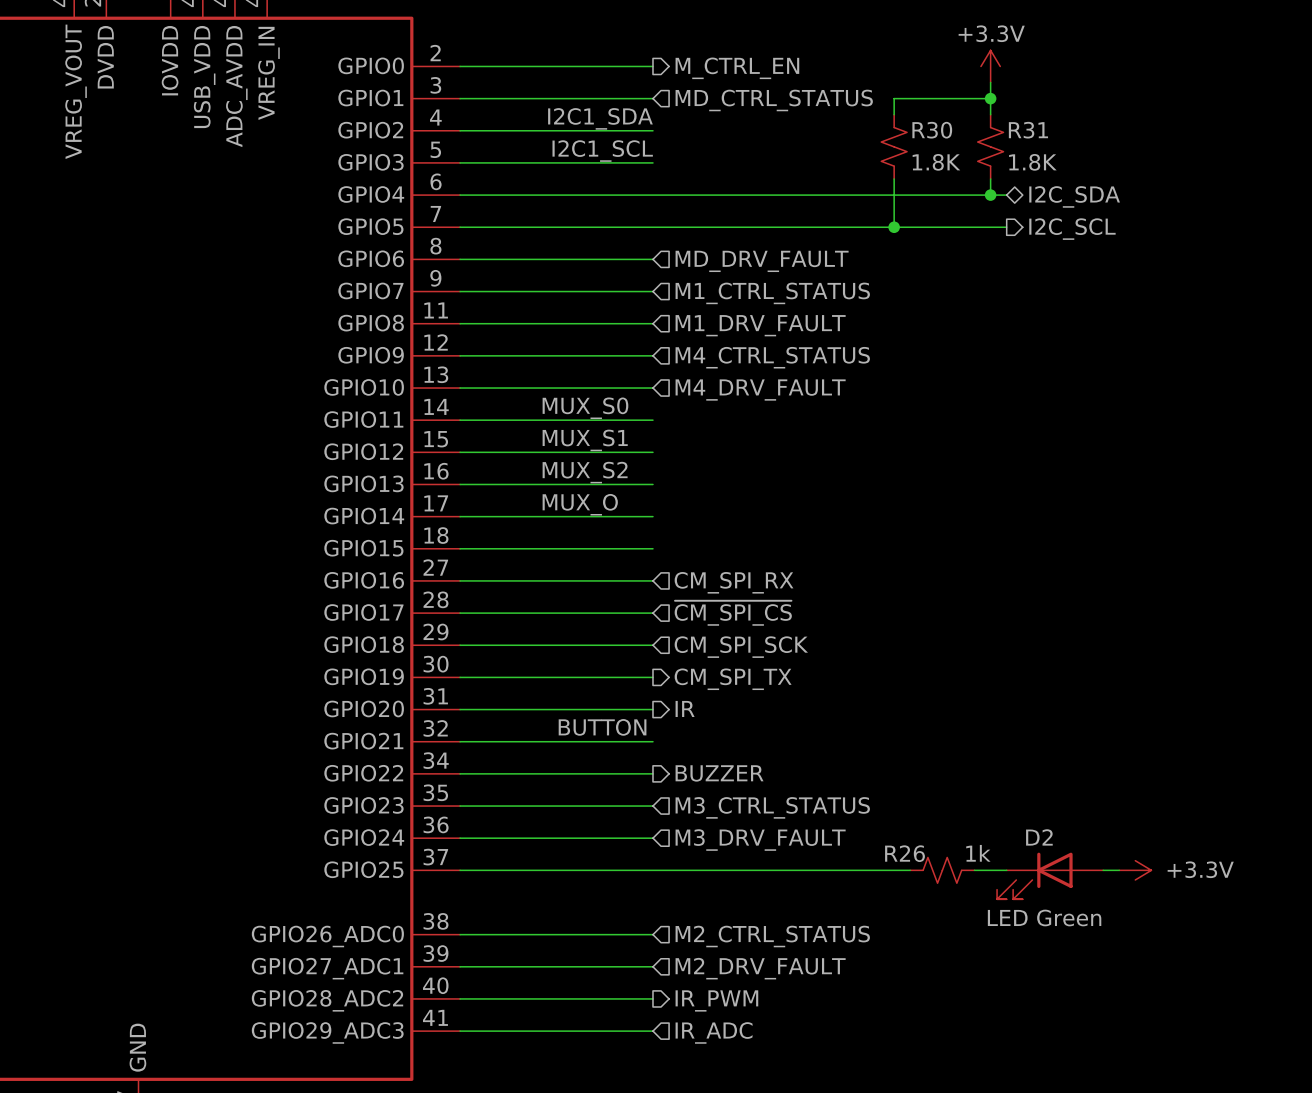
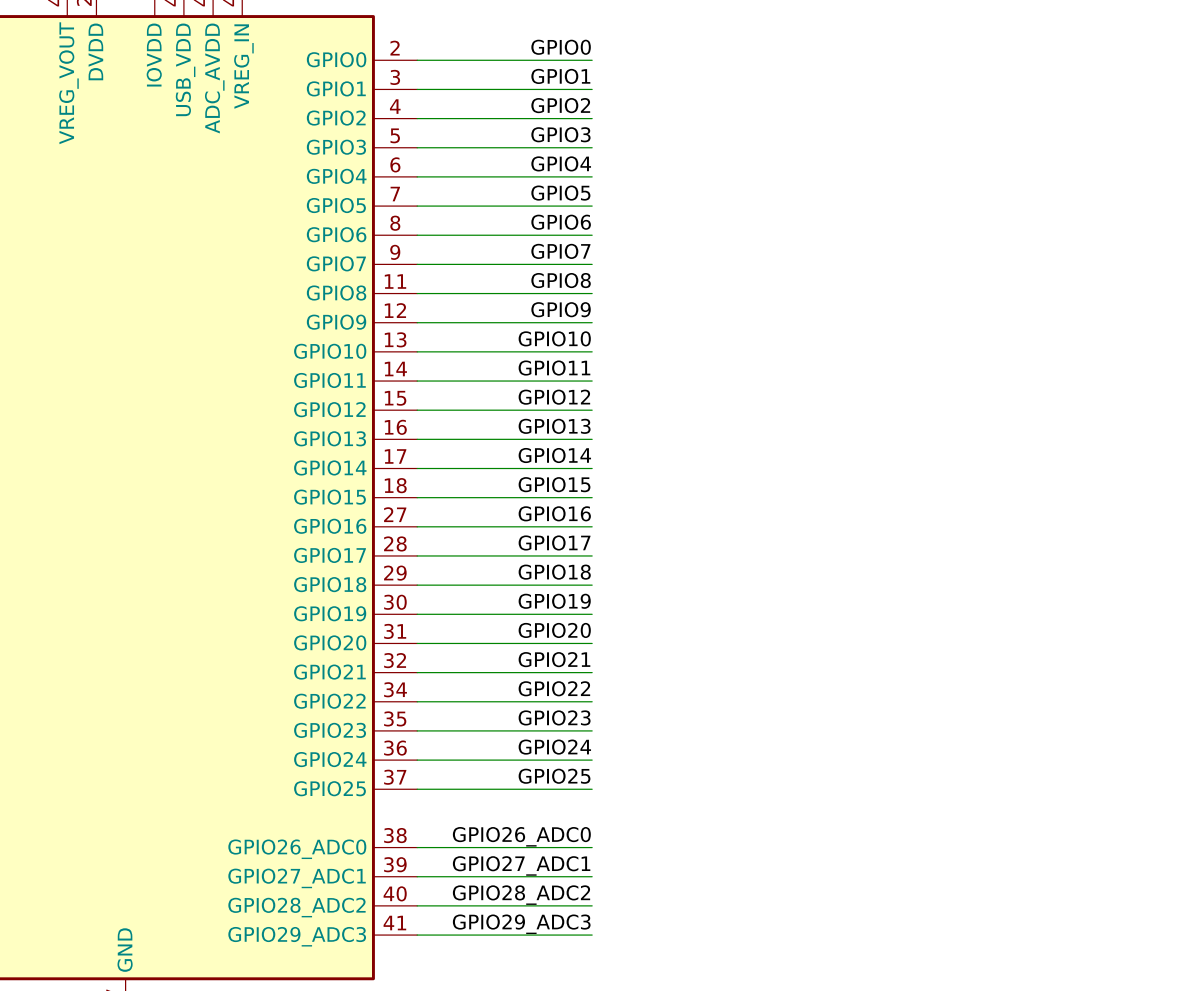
label: none -> GPIO0 (561, 47)
power symbol: +3.3V (990, 66) -> none
hierarchical label: M_CTRL_EN (737, 68) -> none
wire: (990, 82) (990, 114) -> none
label: none -> GPIO1 (560, 76)
wire: (990, 98) (894, 98) (894, 114) -> none
junction: (990, 98) -> none
hierarchical label: MD_CTRL_STATUS (774, 100) -> none
label: I2C1_SDA (600, 118) -> GPIO2 (560, 105)
R30: 1.8K (894, 146) -> none
R31: 1.8K (990, 146) -> none
label: I2C1_SCL (602, 151) -> GPIO3 (560, 134)
wire: (894, 179) (894, 227) -> none
wire: (990, 179) (990, 195) -> none
label: none -> GPIO4 (561, 163)
wire: (652, 195) (1006, 195) -> none
junction: (990, 195) -> none
hierarchical label: I2C_SDA (1074, 196) -> none
label: none -> GPIO5 (560, 193)
wire: (652, 227) (1006, 227) -> none
junction: (894, 227) -> none
hierarchical label: I2C_SCL (1072, 229) -> none
label: none -> GPIO6 (561, 222)
hierarchical label: MD_DRV_FAULT (762, 261) -> none
label: none -> GPIO7 (560, 251)
hierarchical label: M1_CTRL_STATUS (772, 293) -> none
label: none -> GPIO8 (561, 280)
hierarchical label: M1_DRV_FAULT (760, 325) -> none
label: none -> GPIO9 (561, 309)
hierarchical label: M4_CTRL_STATUS (772, 357) -> none
label: none -> GPIO10 (554, 338)
hierarchical label: M4_DRV_FAULT (760, 390) -> none
label: none -> GPIO11 (554, 368)
label: MUX_S0 (585, 408) -> none
label: none -> GPIO12 (554, 397)
label: MUX_S1 (585, 440) -> none
label: none -> GPIO13 (554, 426)
label: MUX_S2 (585, 472) -> none
label: none -> GPIO14 (554, 455)
label: MUX_O (580, 504) -> none
label: none -> GPIO15 (554, 484)
label: none -> GPIO16 (554, 513)
hierarchical label: CM_SPI_RX (734, 582) -> none
label: none -> GPIO17 (554, 542)
hierarchical label: ~{CM_SPI_CS} (733, 613) -> none
label: none -> GPIO18 (554, 572)
hierarchical label: CM_SPI_SCK (741, 647) -> none
label: none -> GPIO19 (554, 601)
hierarchical label: CM_SPI_TX (733, 679) -> none
label: none -> GPIO20 (554, 630)
hierarchical label: IR (685, 708) -> none
label: BUTTON (602, 727) -> none
label: none -> GPIO21 (554, 659)
label: none -> GPIO22 (554, 688)
hierarchical label: BUZZER (719, 773) -> none
label: none -> GPIO23 (554, 717)
hierarchical label: M3_CTRL_STATUS (772, 807) -> none
label: none -> GPIO24 (554, 747)
hierarchical label: M3_DRV_FAULT (760, 840) -> none
label: none -> GPIO25 (554, 776)
wire: (652, 870) (910, 870) -> none
R26: 1k (942, 870) -> none
wire: (974, 870) (1006, 870) -> none
wire: (1103, 870) (1119, 870) -> none
power symbol: +3.3V (1135, 870) -> none
D2: LED Green (1050, 875) -> none
label: none -> GPIO26_ADC0 (521, 836)
hierarchical label: M2_CTRL_STATUS (772, 936) -> none
label: none -> GPIO27_ADC1 (521, 865)
hierarchical label: M2_DRV_FAULT (760, 968) -> none
label: none -> GPIO28_ADC2 (521, 895)
hierarchical label: IR_PWM (716, 1000) -> none
label: none -> GPIO29_ADC3 (521, 924)
hierarchical label: IR_ADC (714, 1032) -> none

